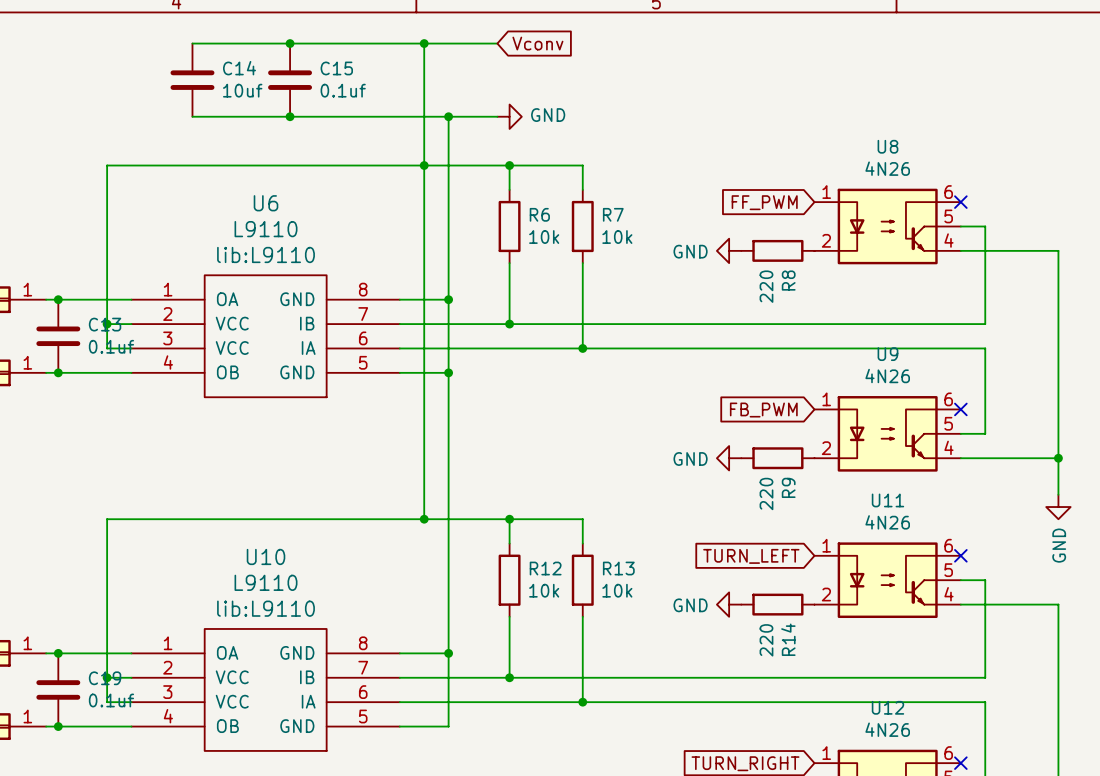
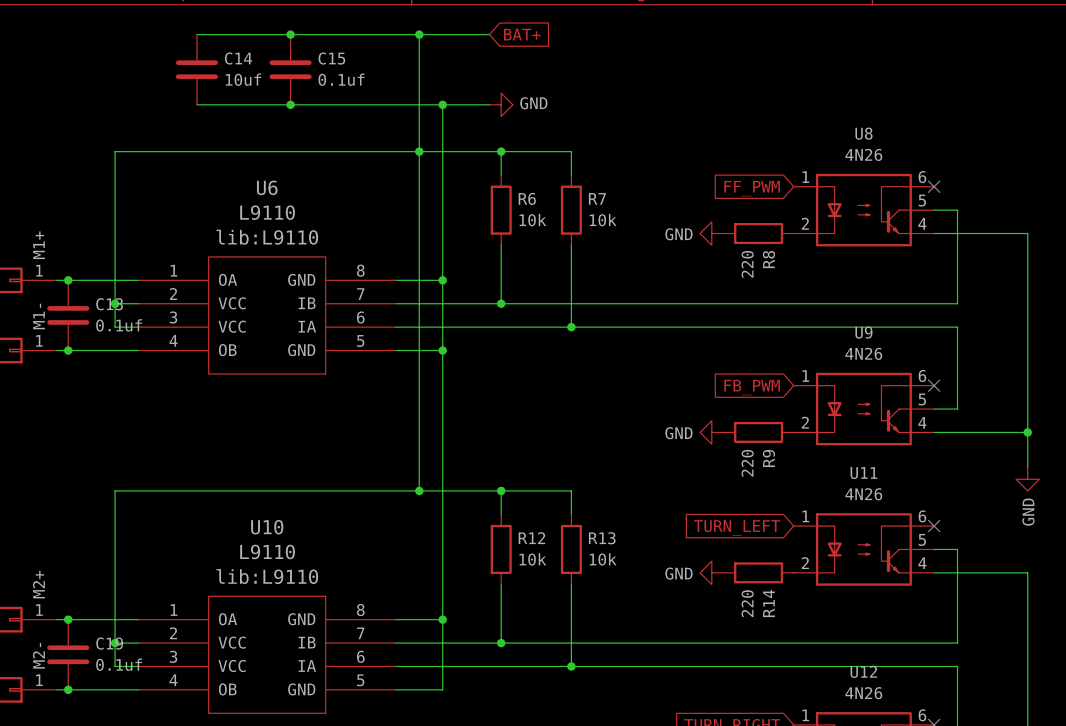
global label: Vconv (537, 43) -> BAT+ (522, 34)
part value: none -> M1+ (39, 245)
part value: none -> M1- (39, 316)
part value: none -> M2+ (38, 584)
part value: none -> M2- (38, 655)

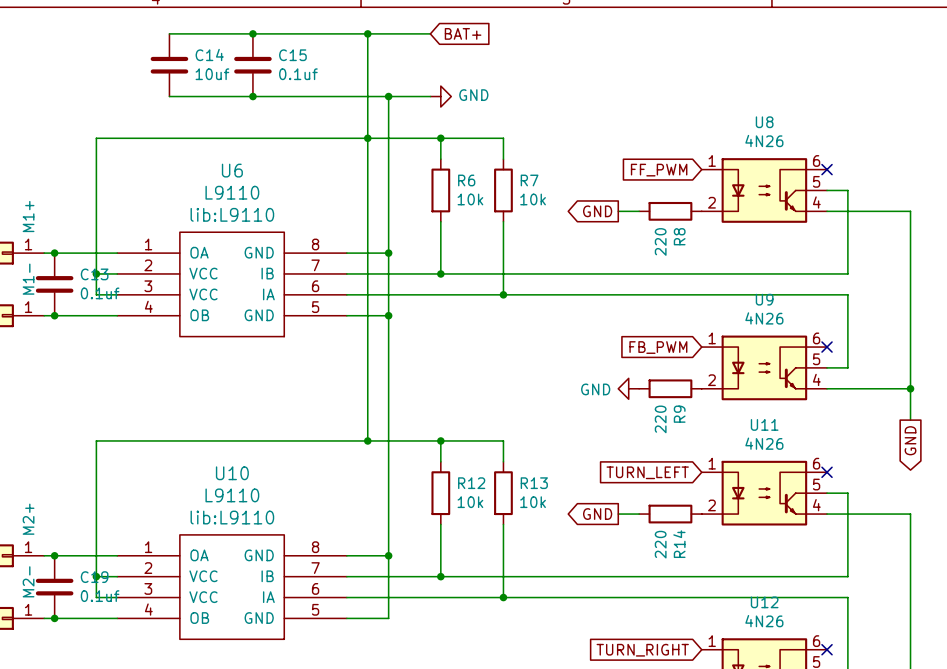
global label: none -> GND (597, 211)
power symbol: GND (711, 233) -> none
power symbol: GND (1027, 479) -> none
global label: none -> GND (910, 440)
global label: none -> GND (597, 514)
power symbol: GND (711, 572) -> none

